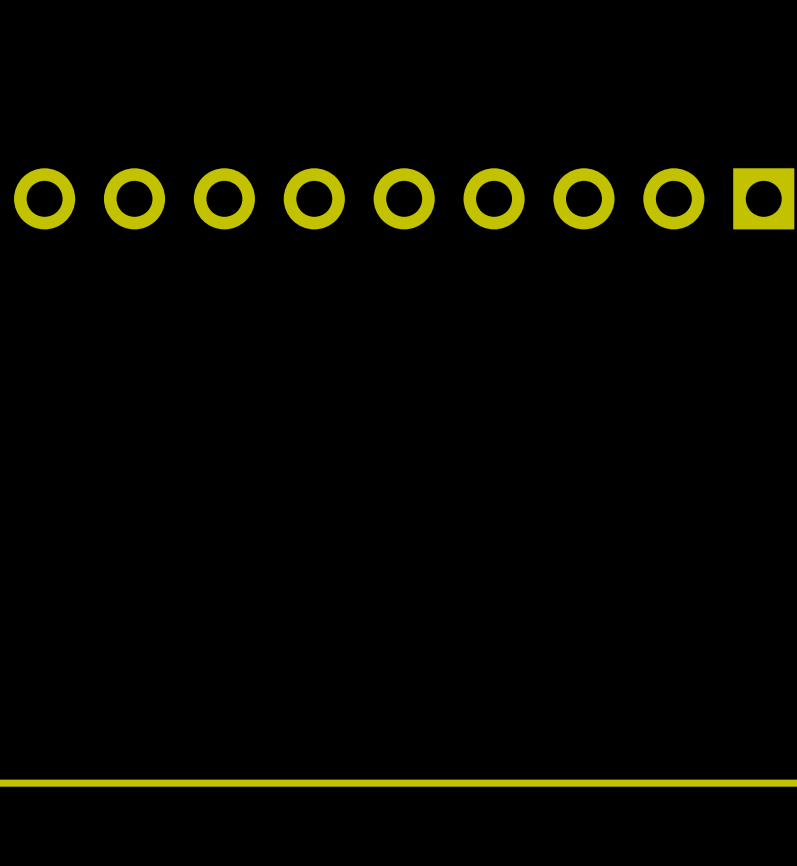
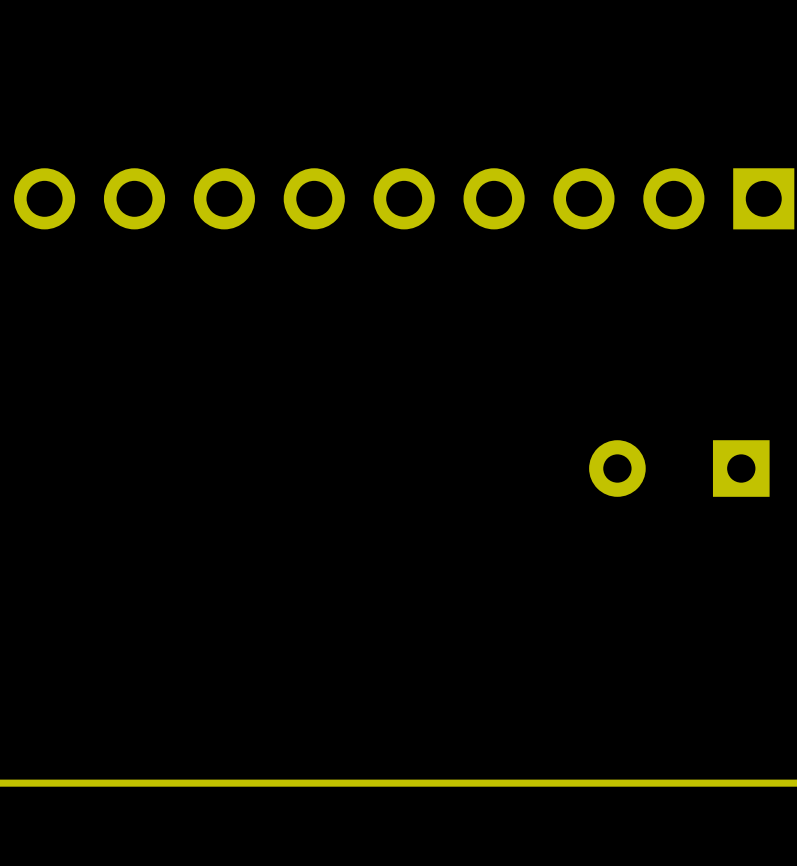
part: none -> (679, 468)

